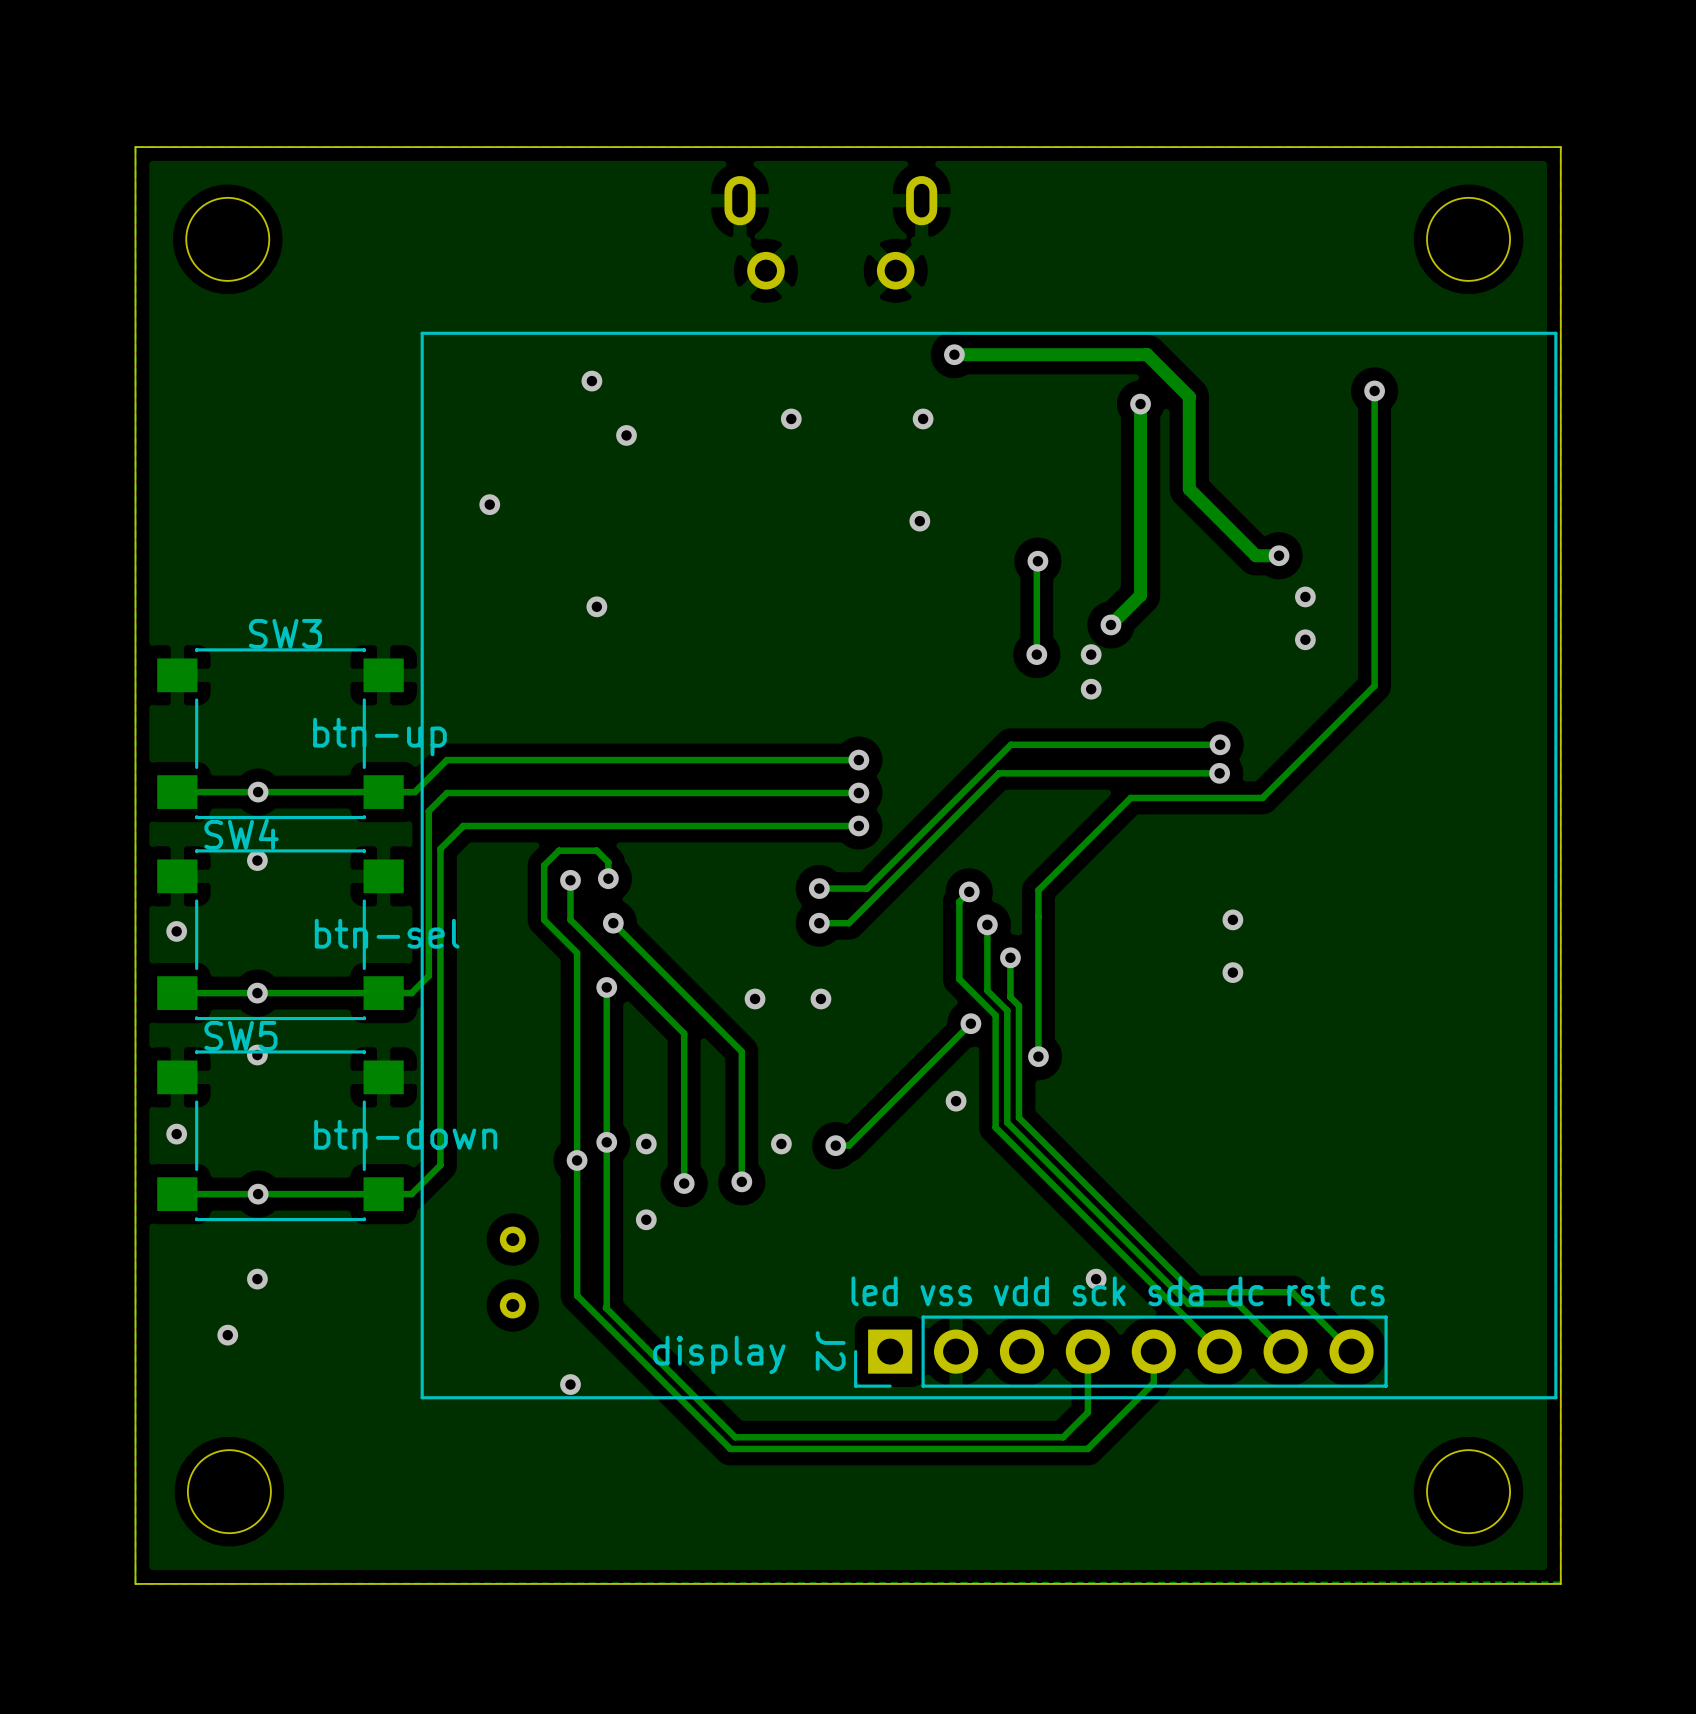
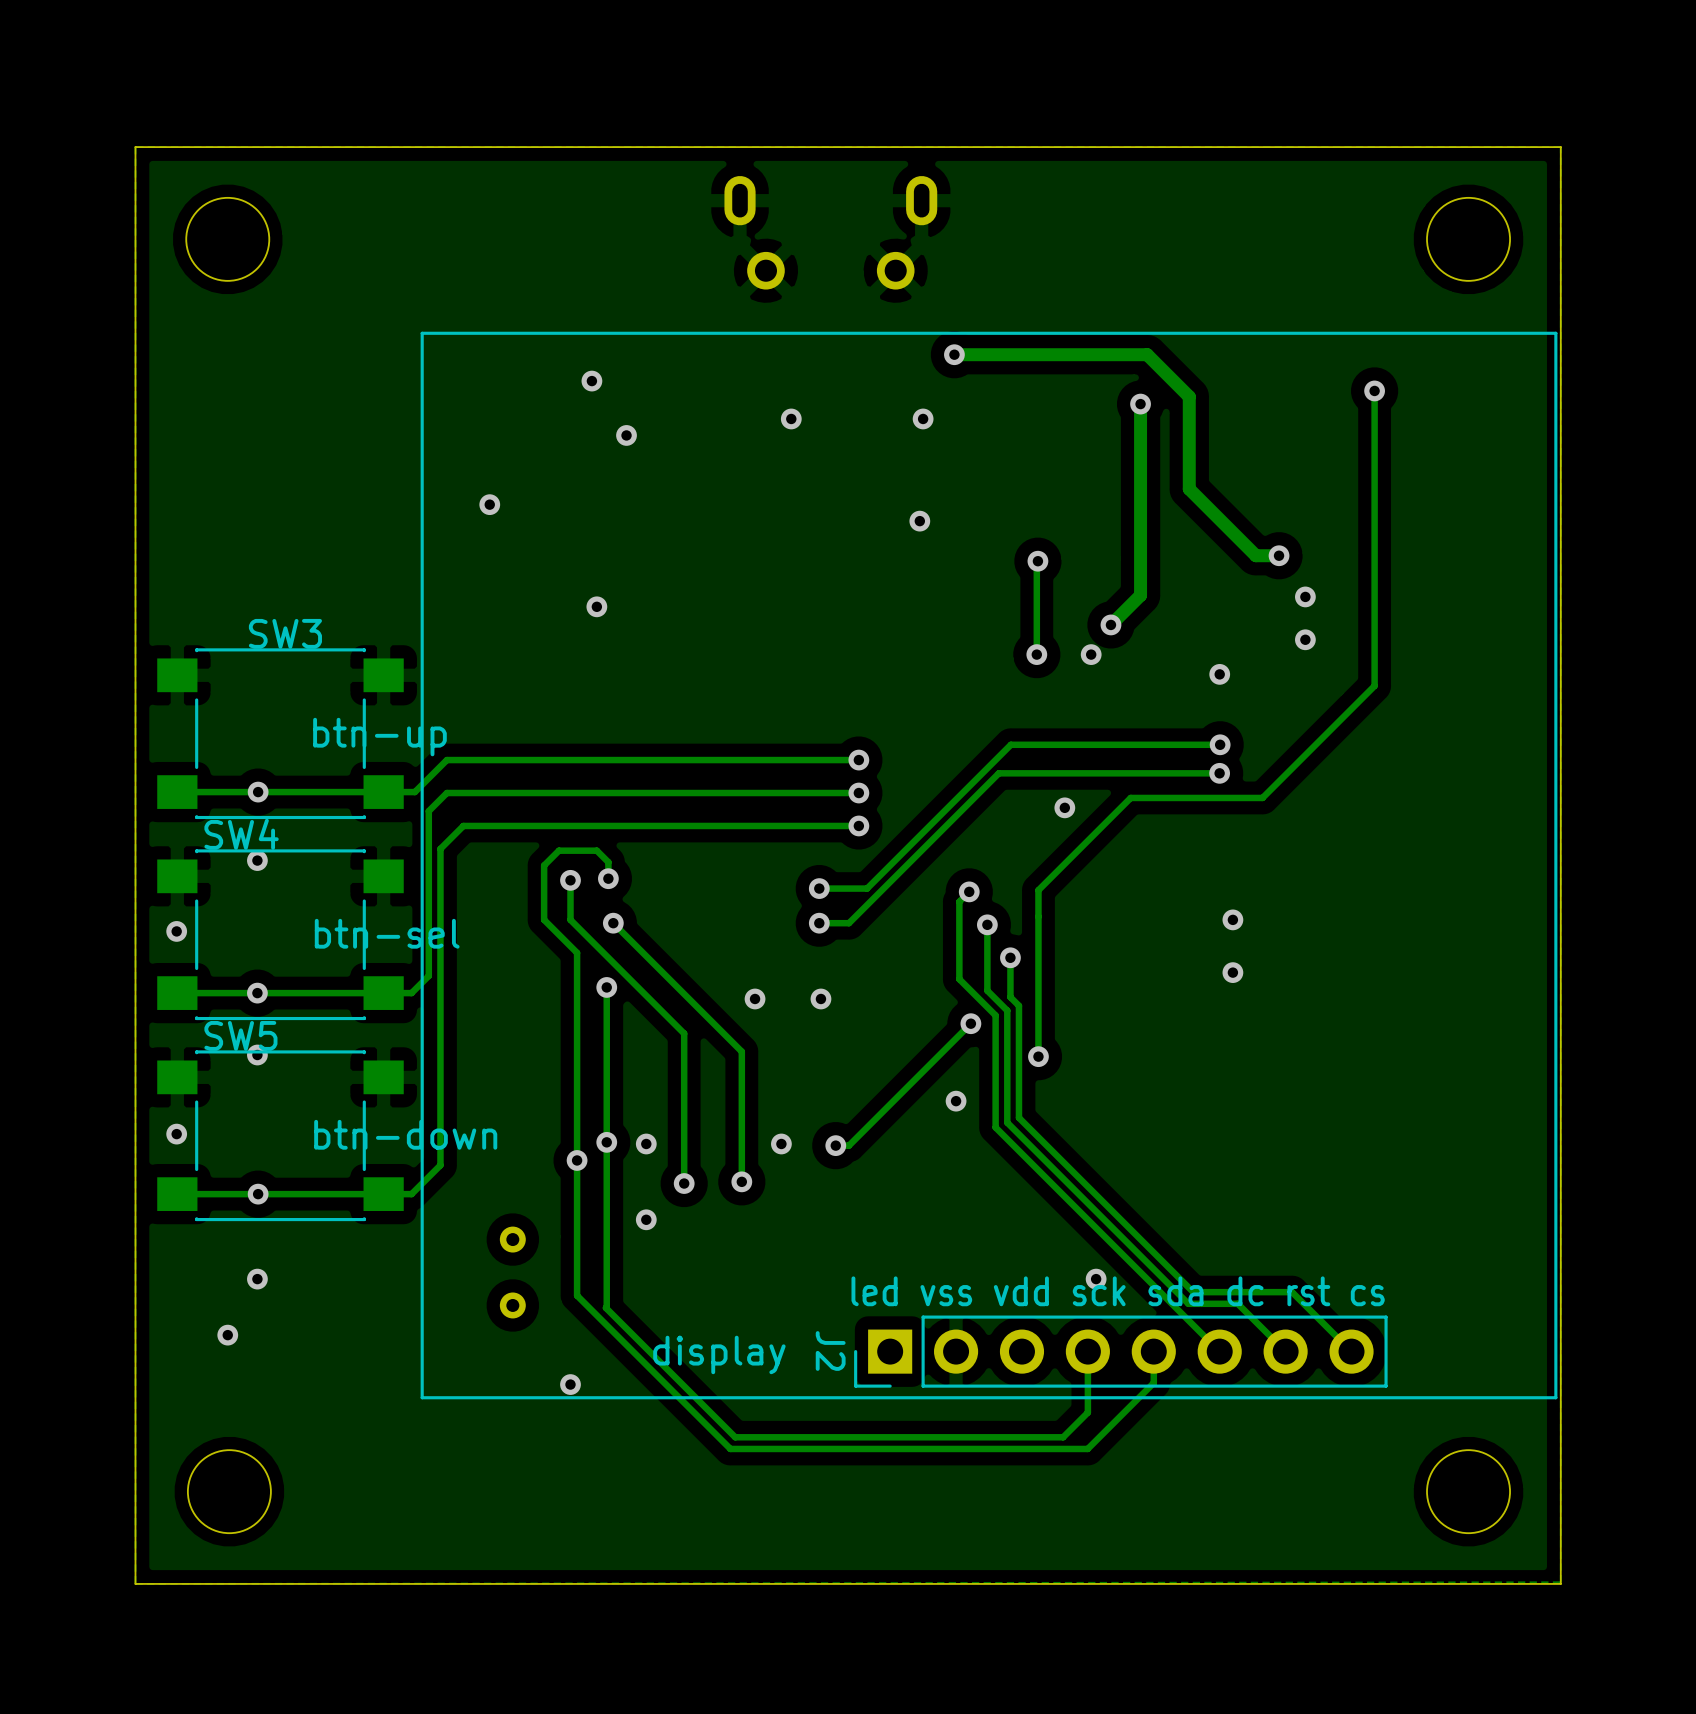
via: none -> (1219, 674)
via: (1091, 689) -> none
via: none -> (1064, 807)

